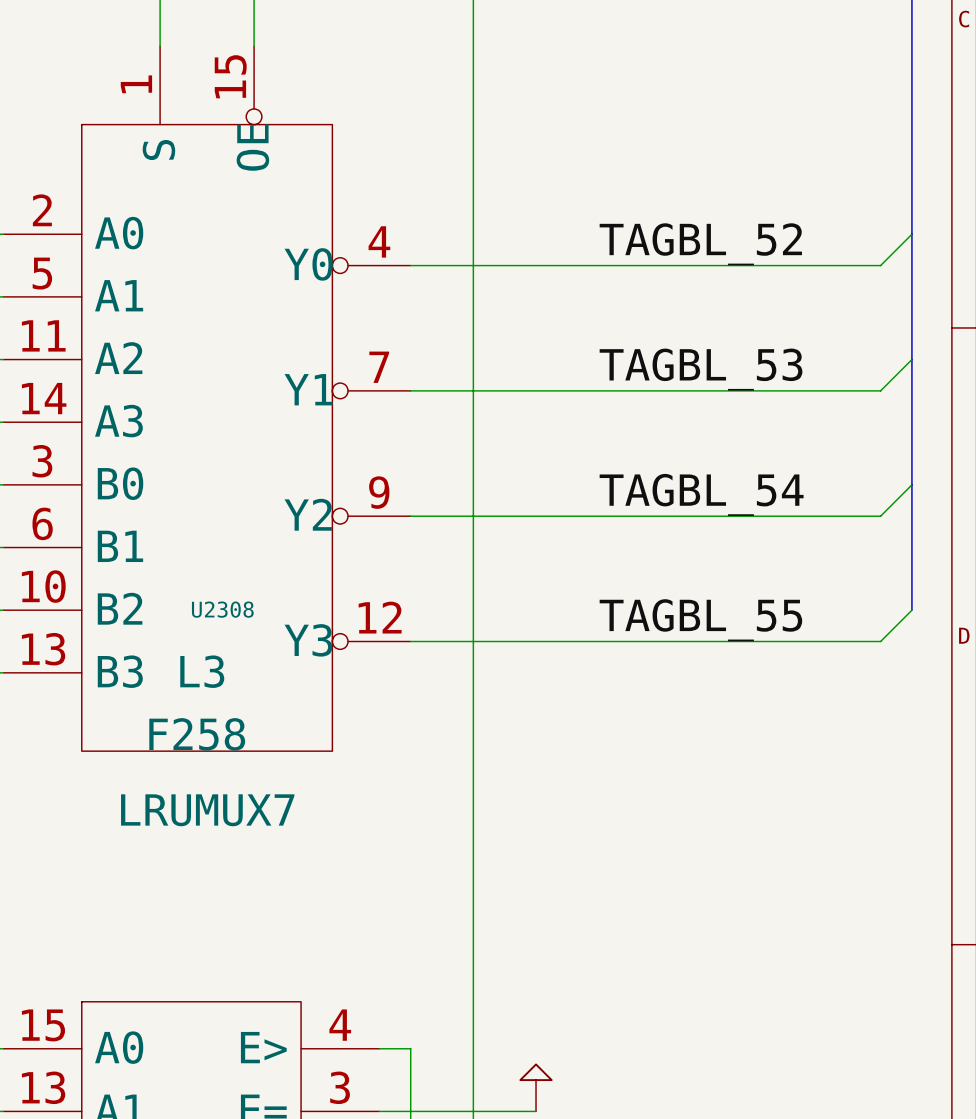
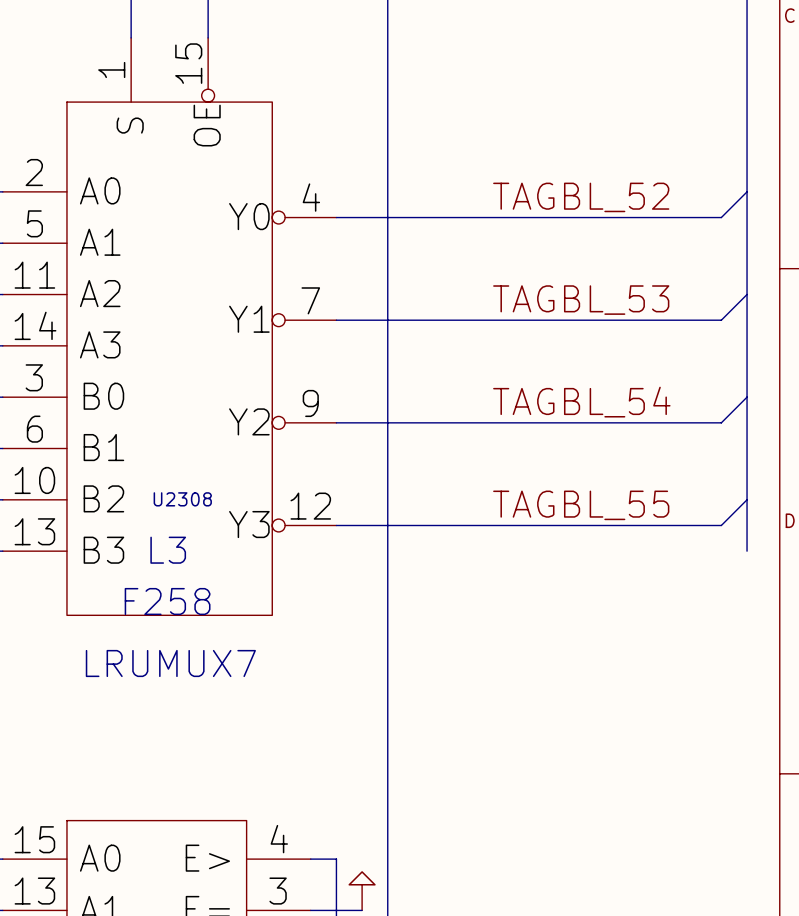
bus: none -> (747, 499) (747, 551)
power symbol position: (536, 1087) -> (362, 890)
wire: (442, 1111) (536, 1111) -> none

